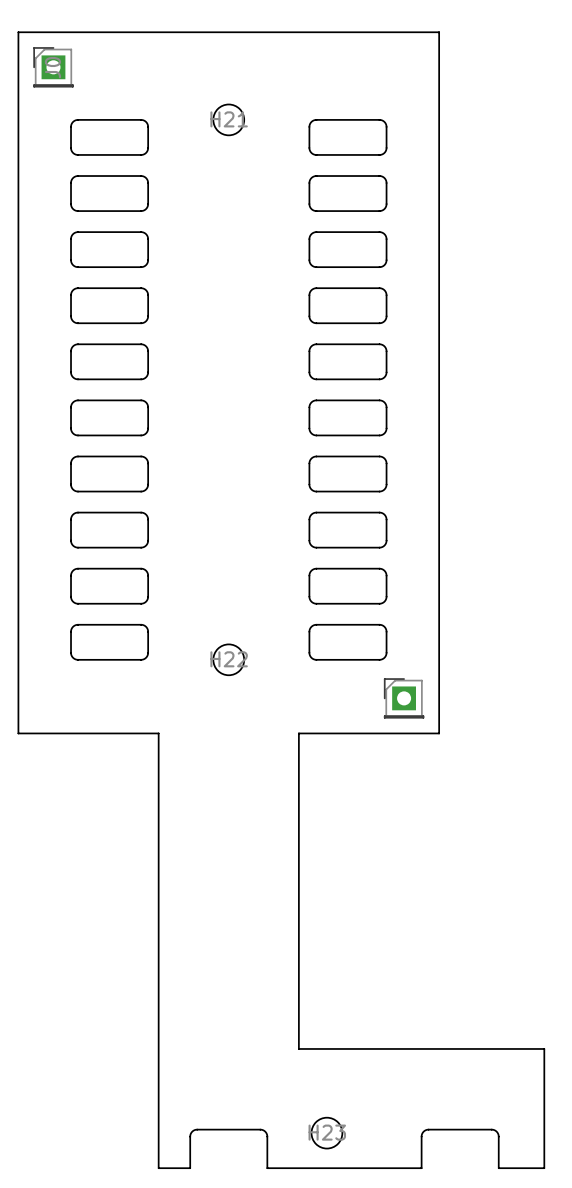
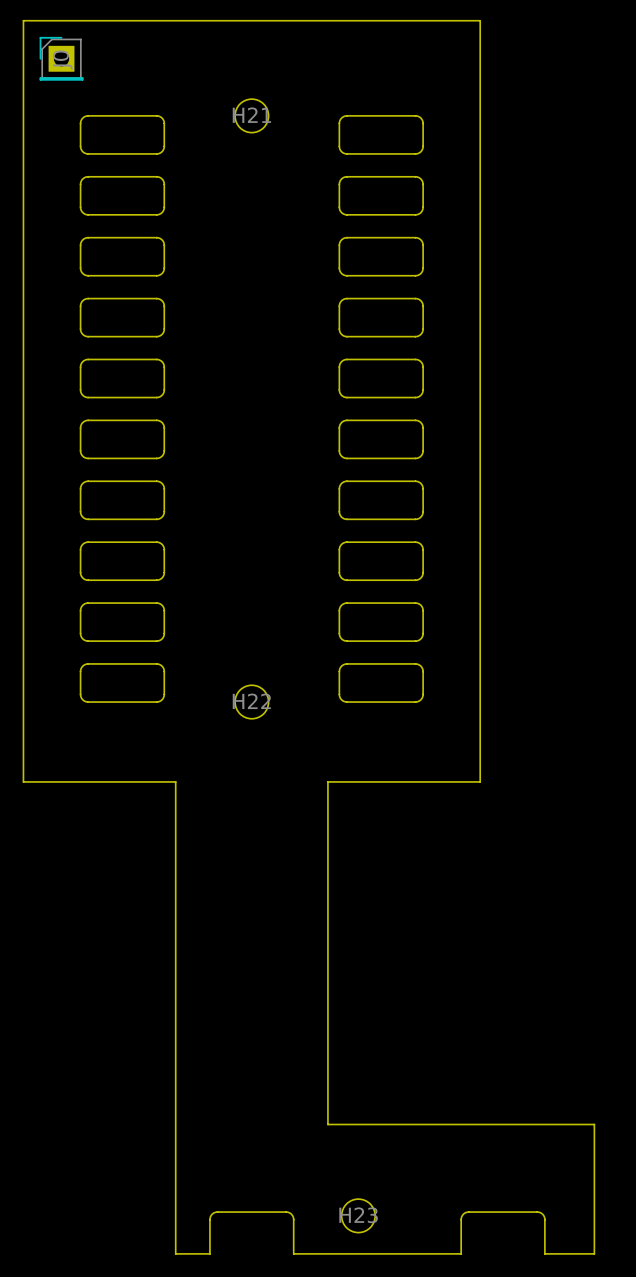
part: (404, 698) -> none

